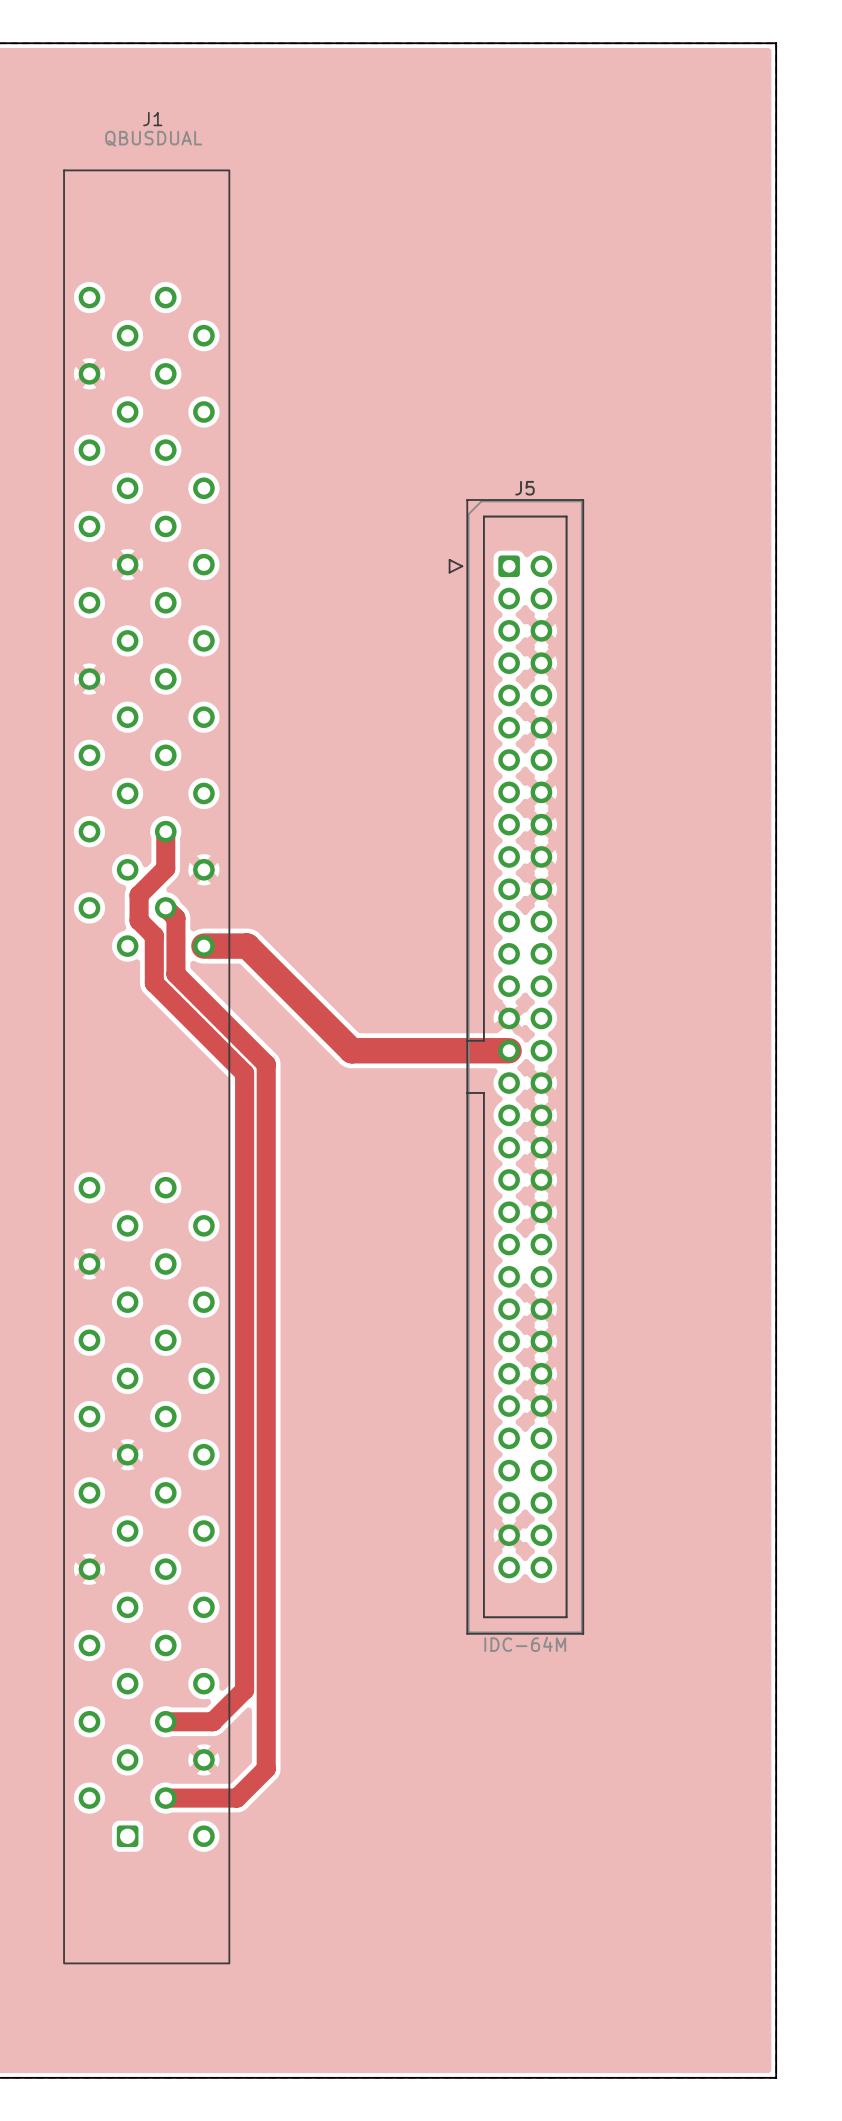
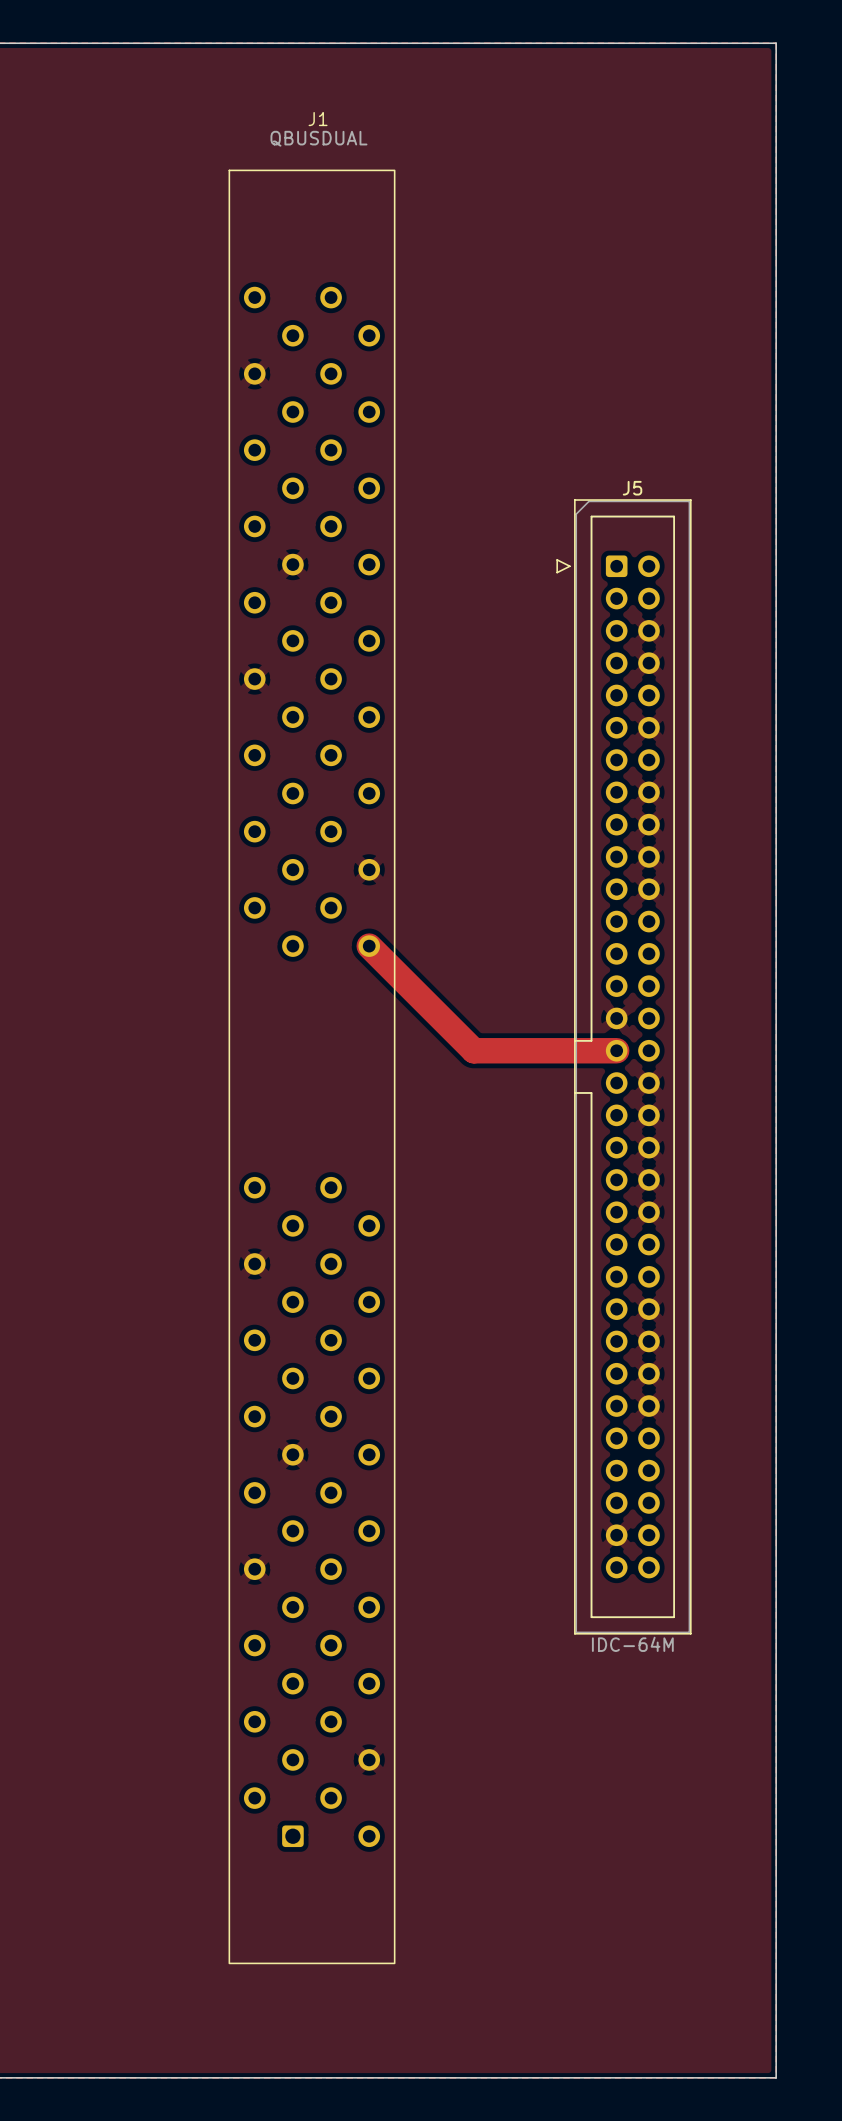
track: (165, 831) (165, 868) (139, 895) (139, 920) (154, 935) (154, 983) (244, 1073) (244, 1690) (212, 1721) (165, 1721) -> none
track: (165, 907) (175, 918) (175, 974) (266, 1064) (266, 1768) (236, 1798) (165, 1798) -> none
track: (203, 946) (247, 946) (351, 1050) (473, 1050) -> (369, 946) (473, 1050)
track: none -> (509, 1050) (616, 1050)
J1 position: (146, 1066) -> (312, 1066)
J5 position: (516, 1066) -> (624, 1066)

